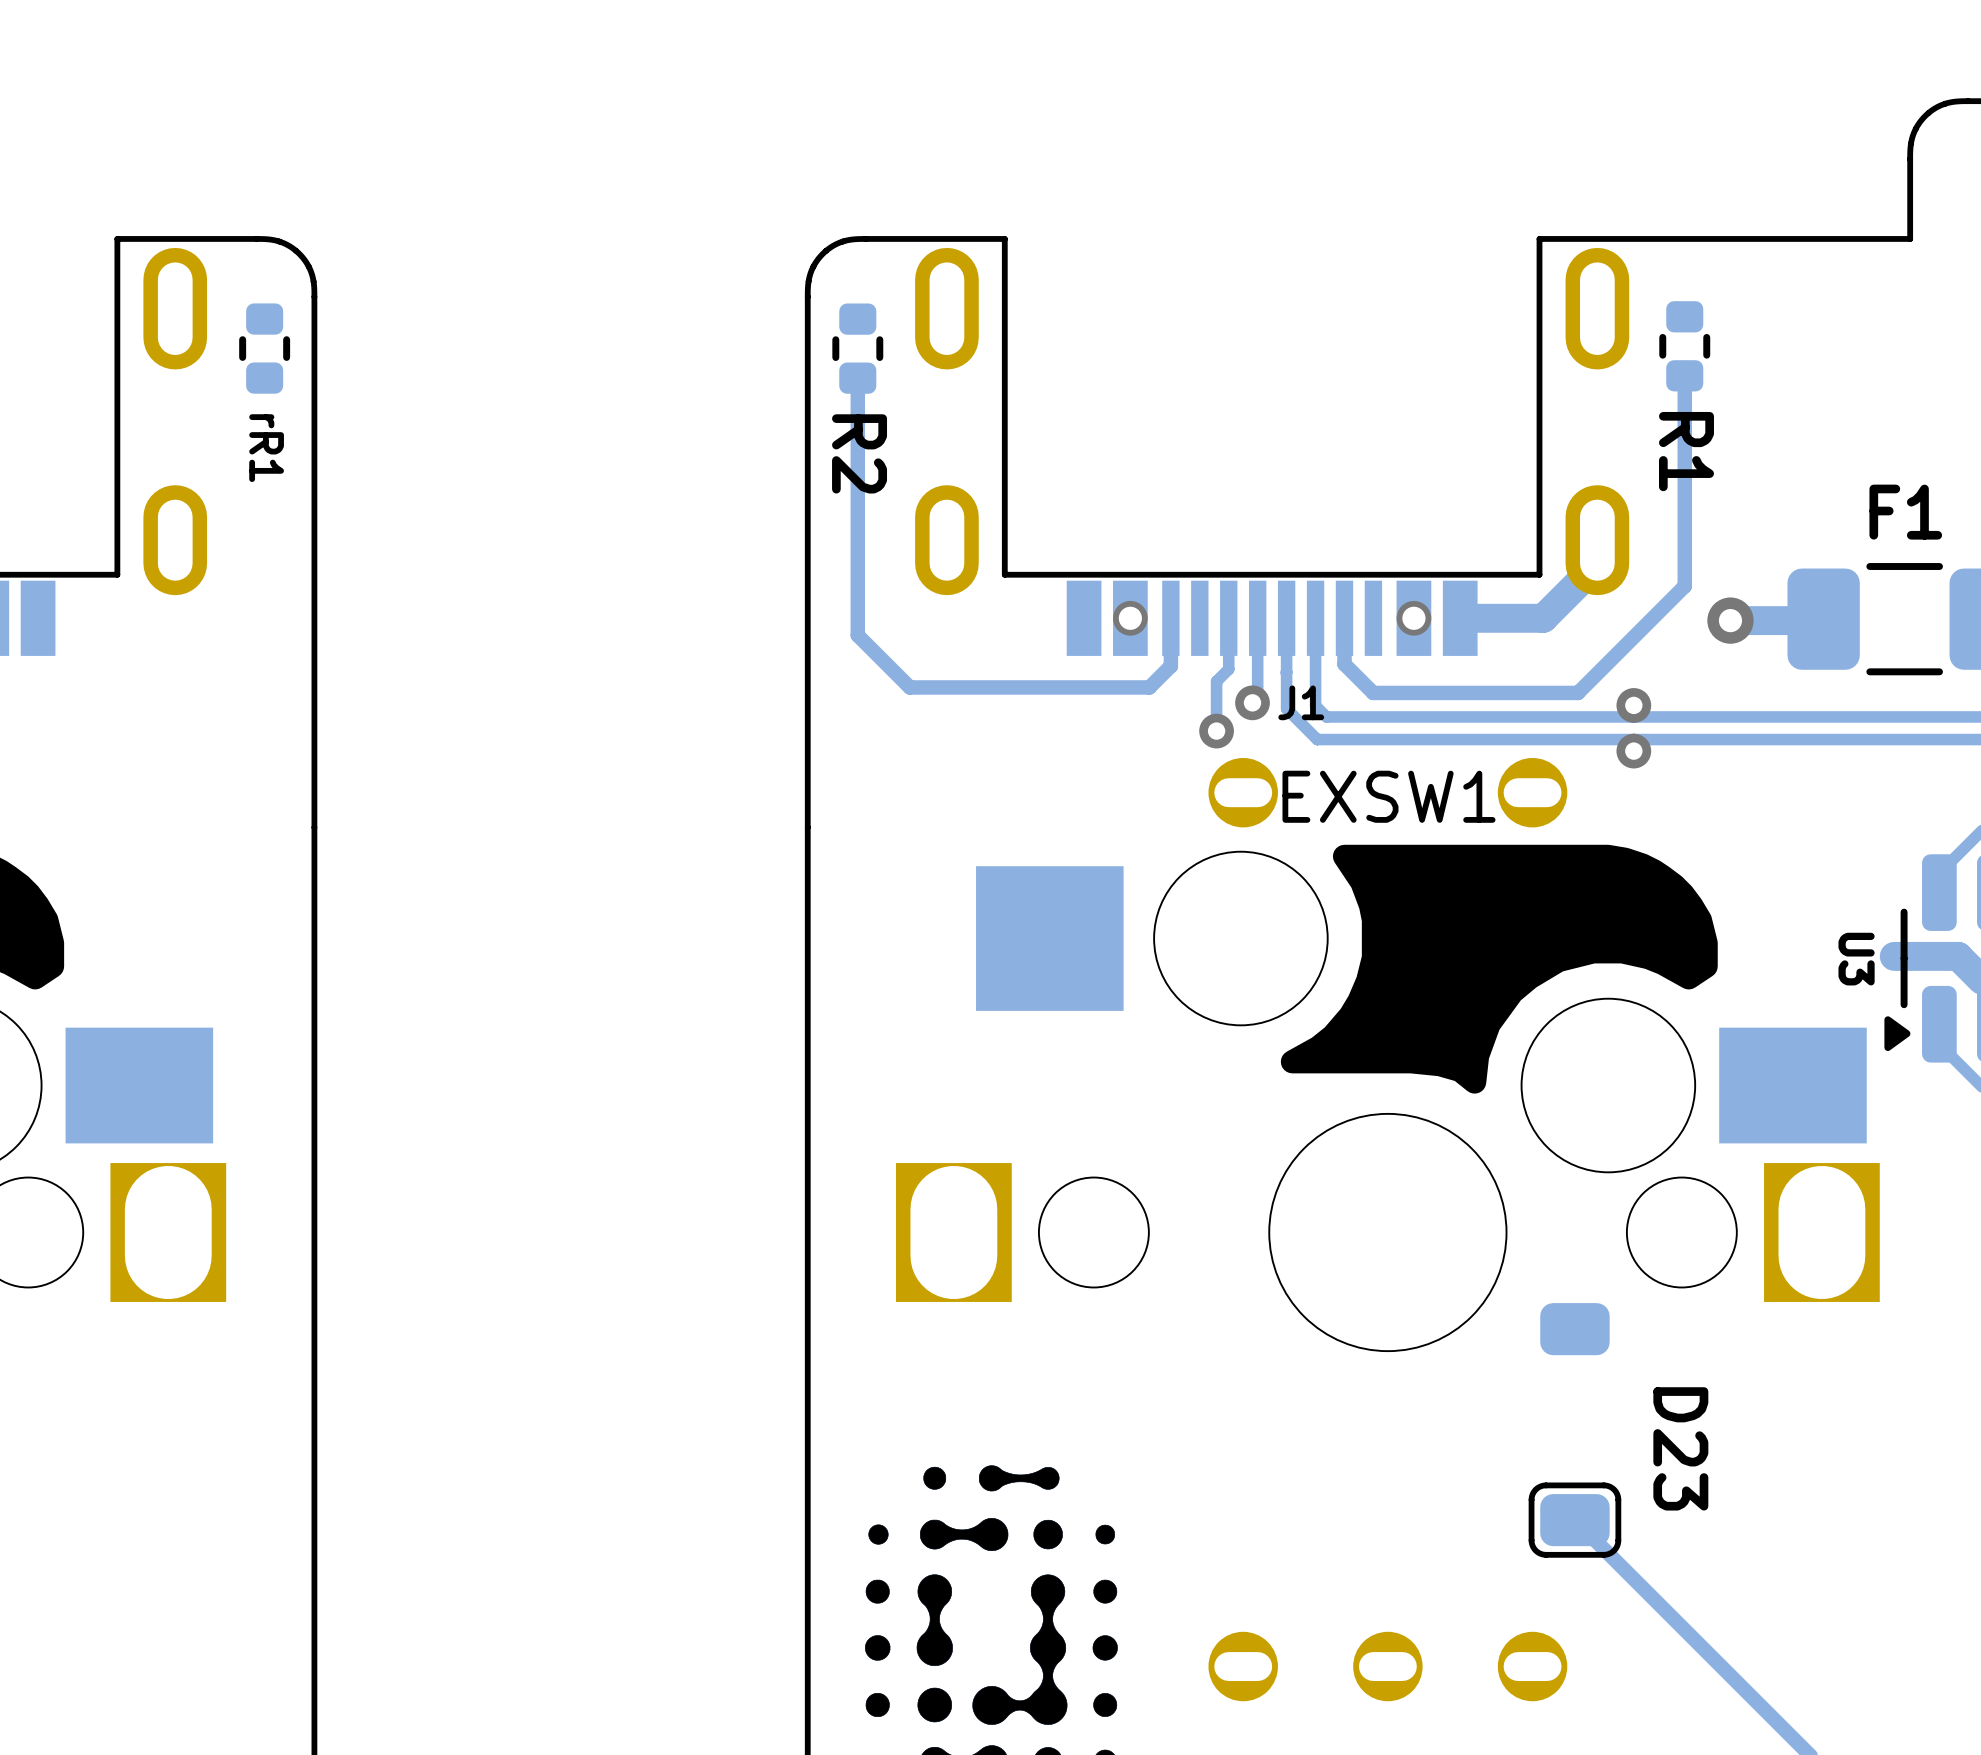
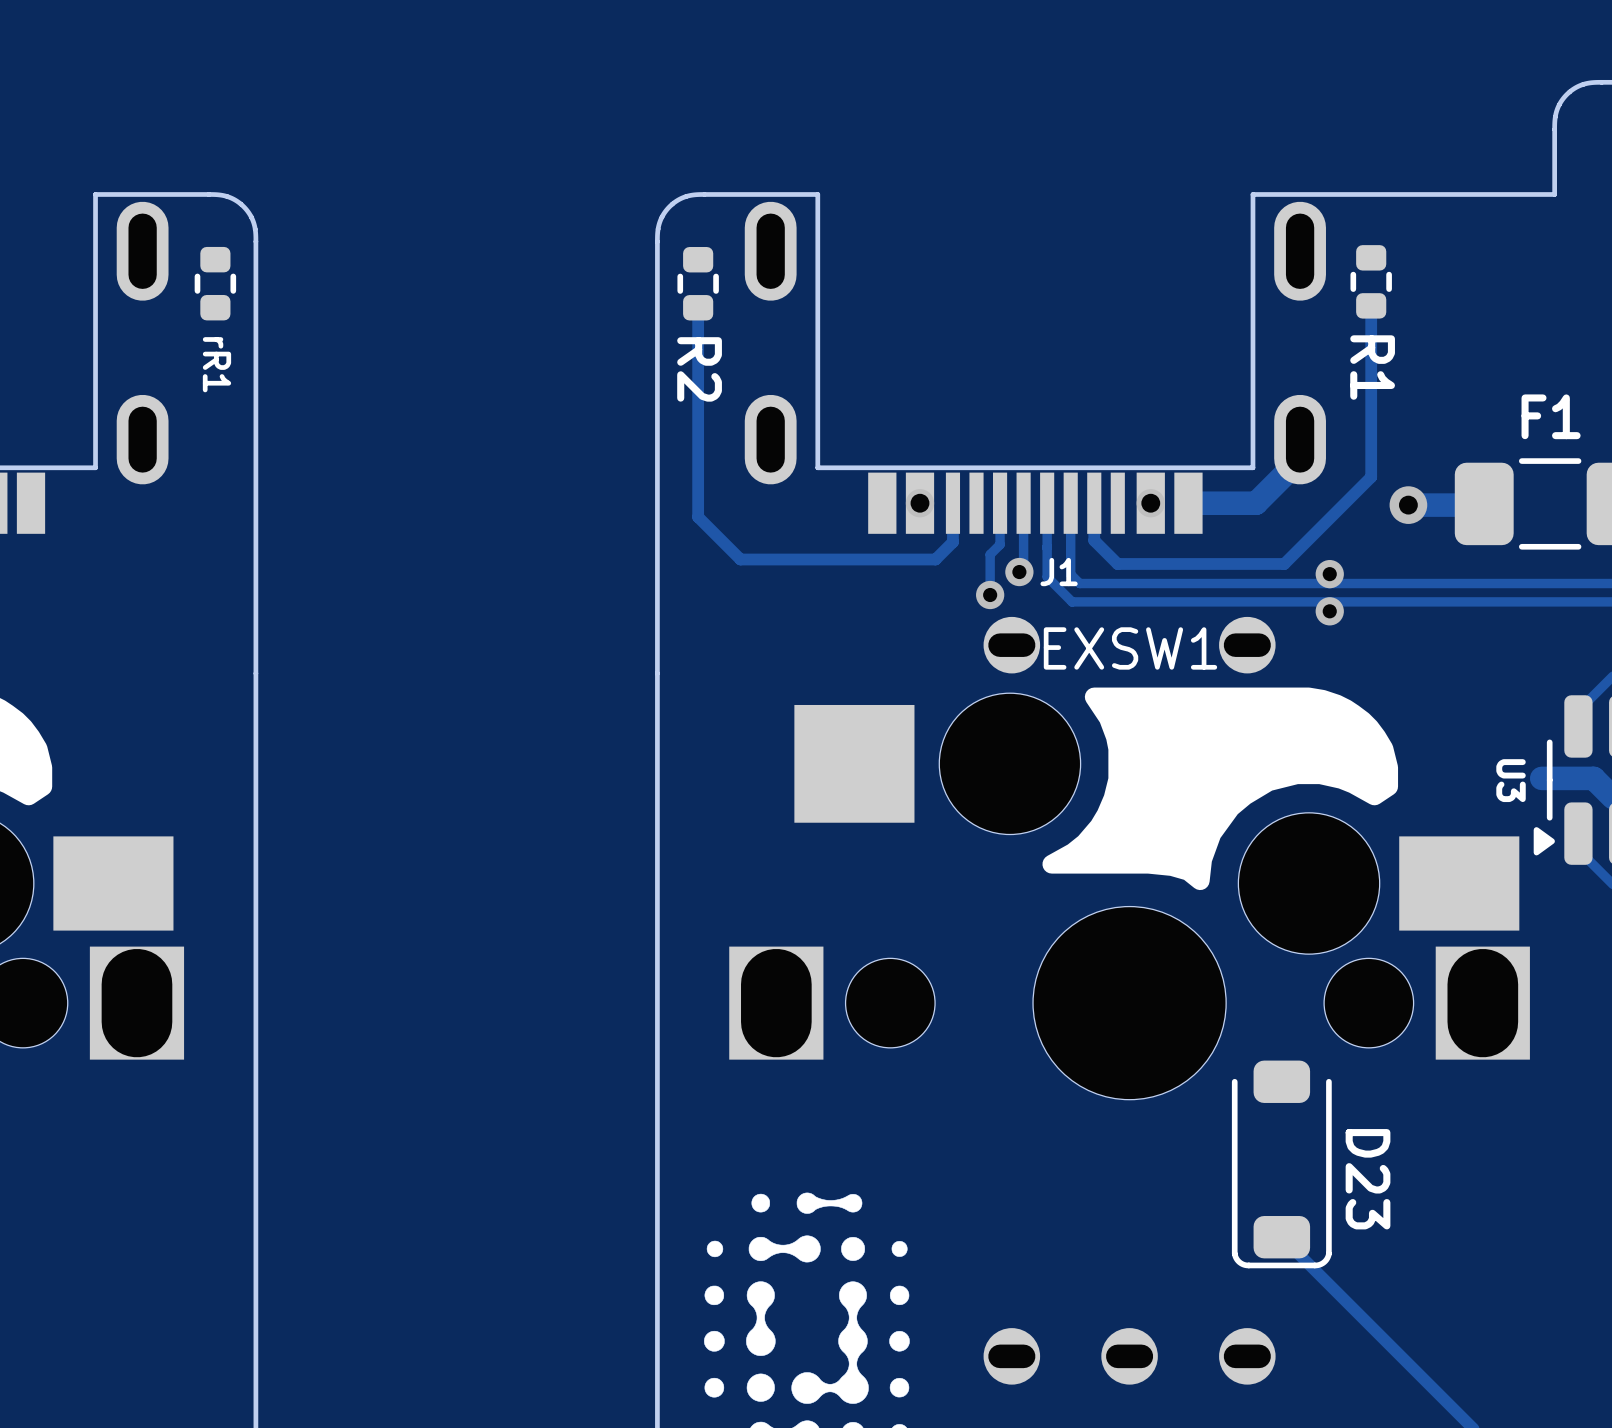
D23 footprint: [1528, 1303, 1622, 1558] -> [1231, 1060, 1332, 1269]

